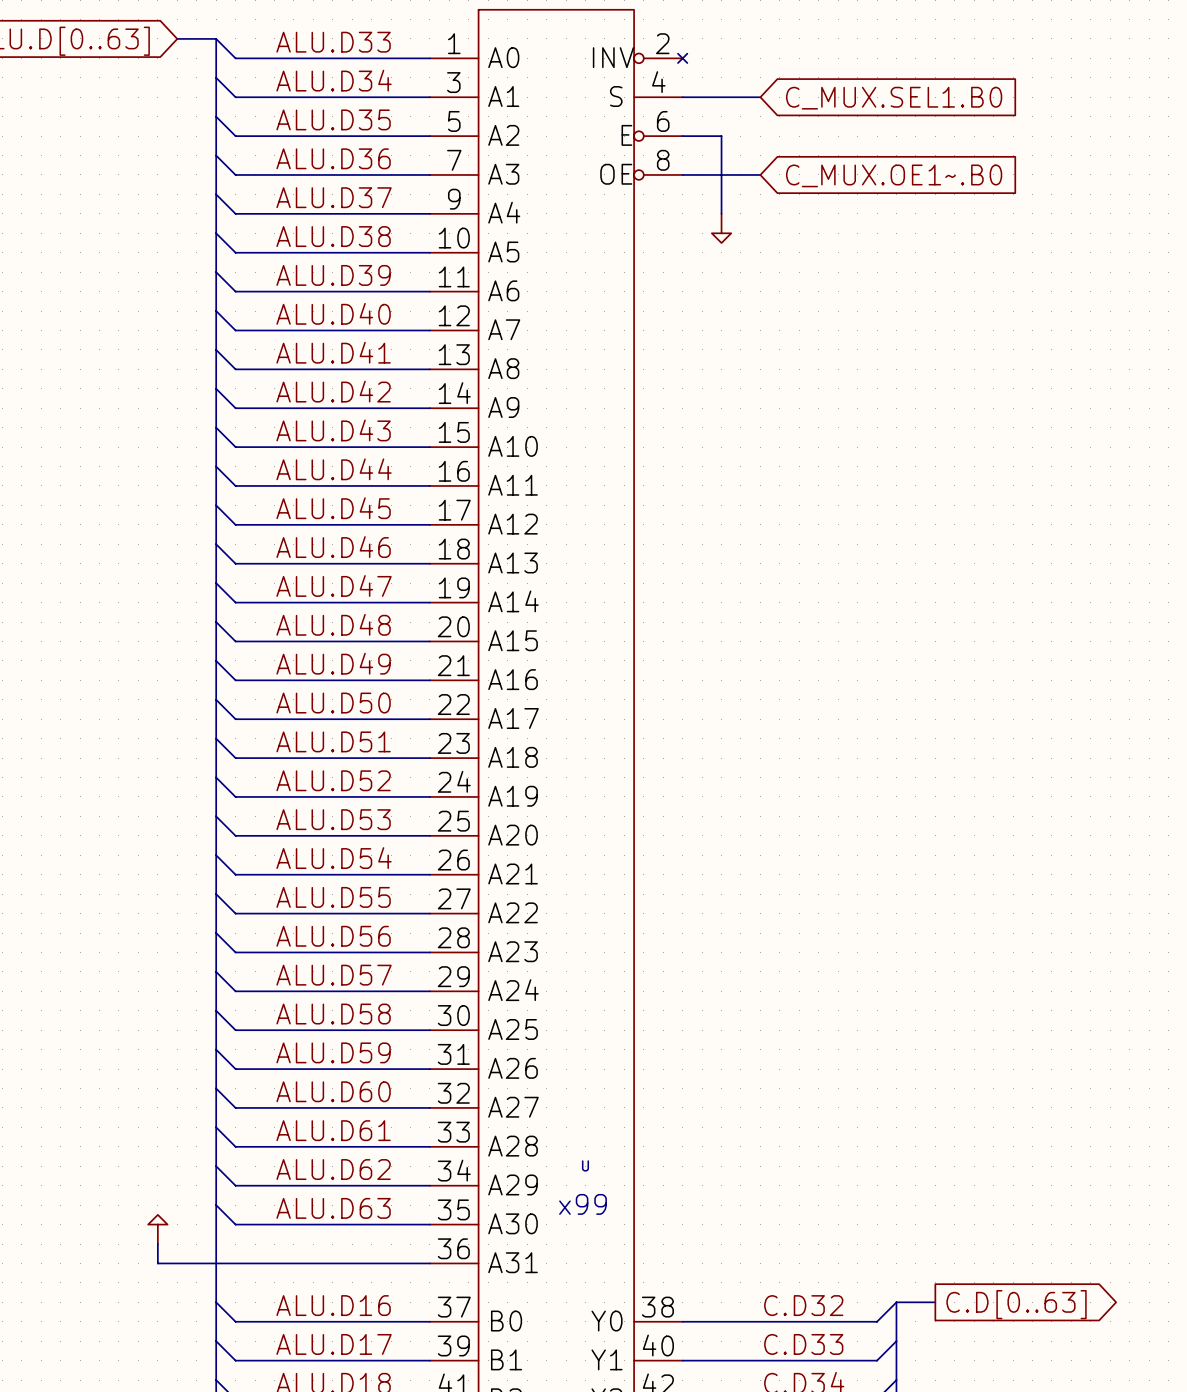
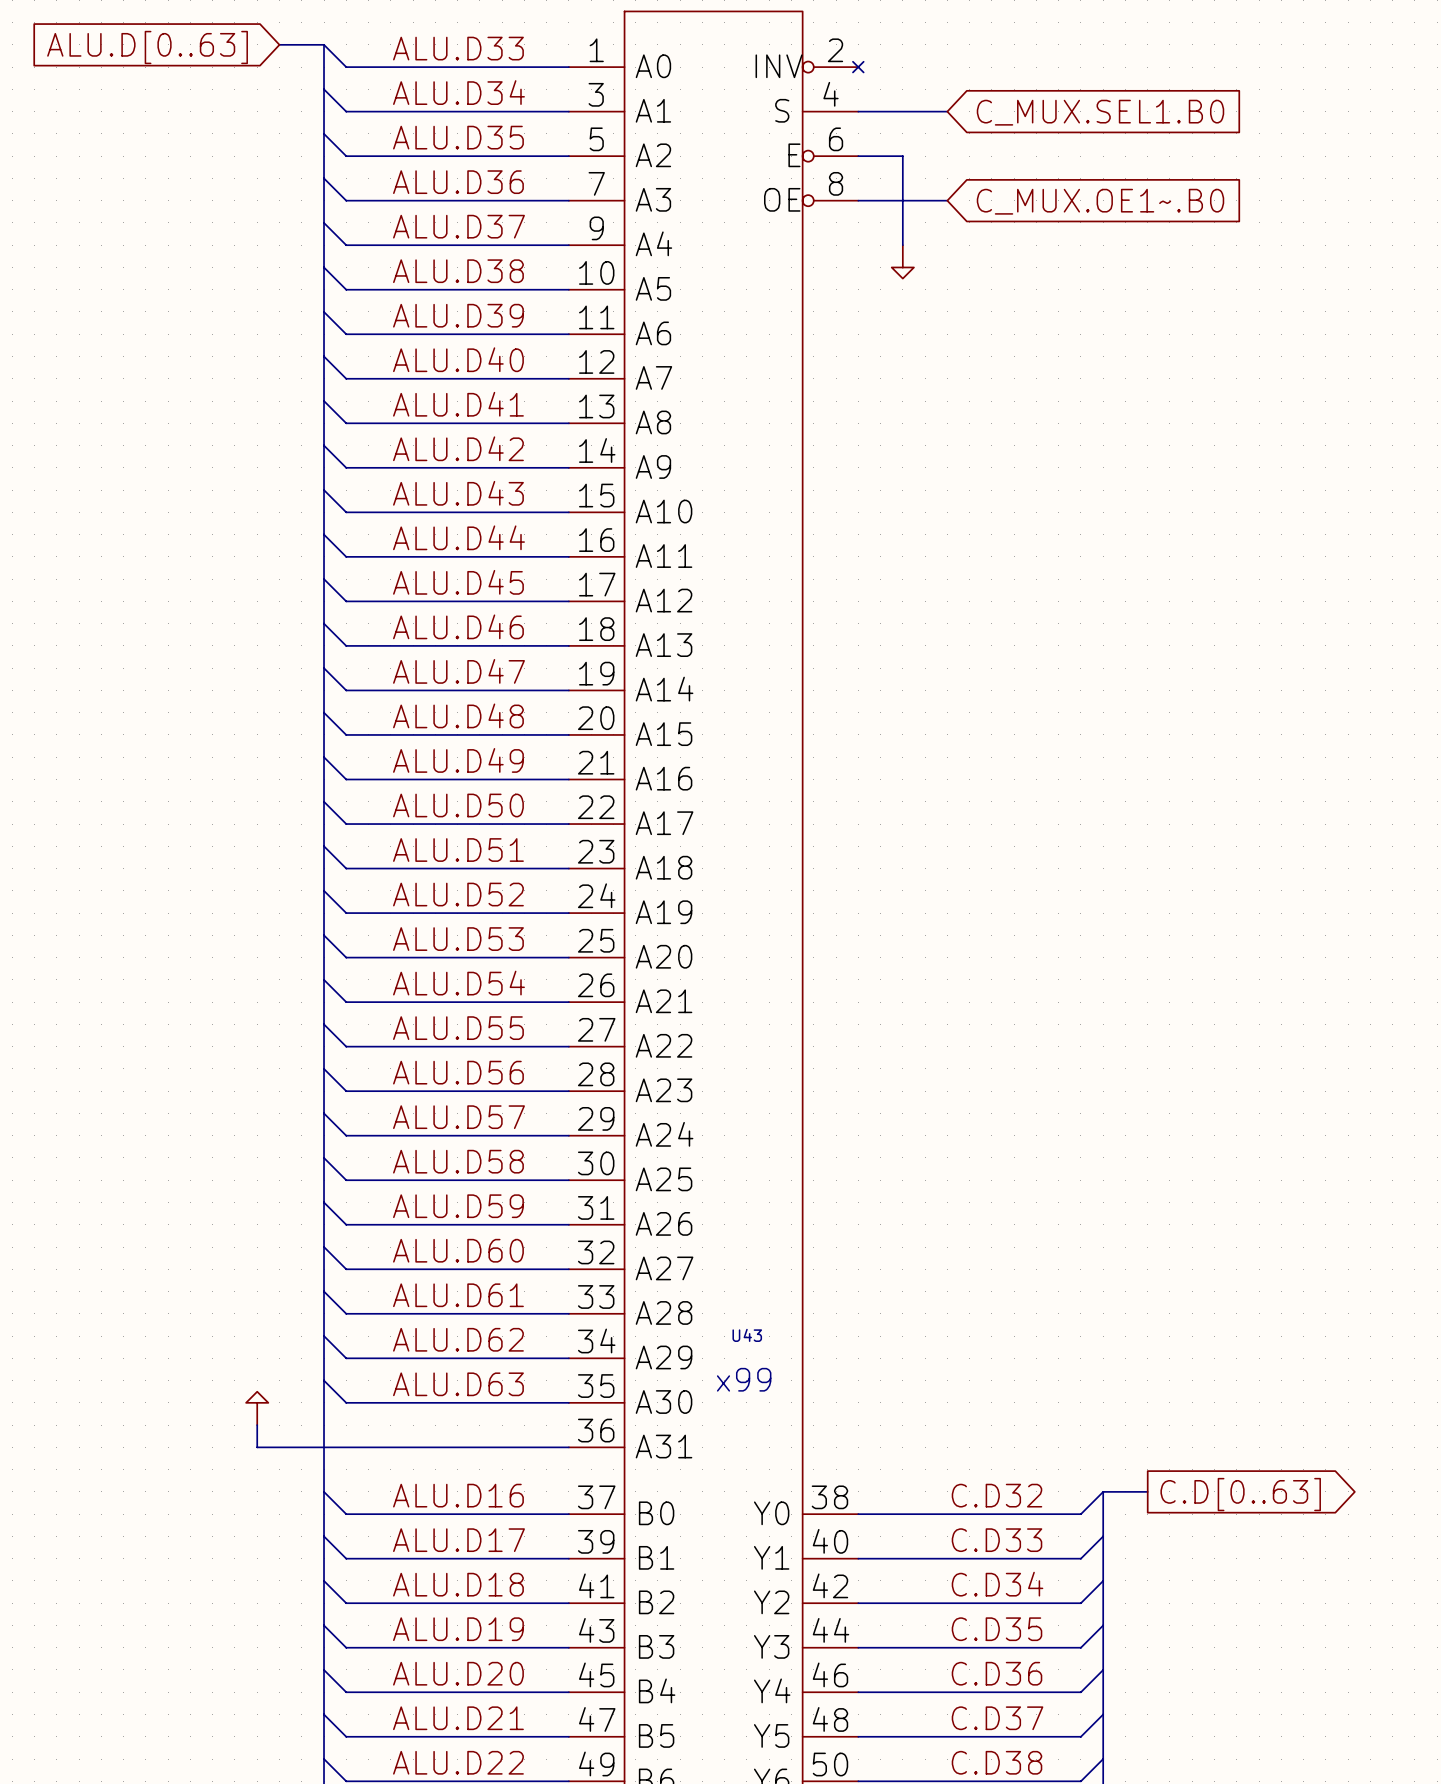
U name: U (585, 1165) -> U43 (747, 1335)

